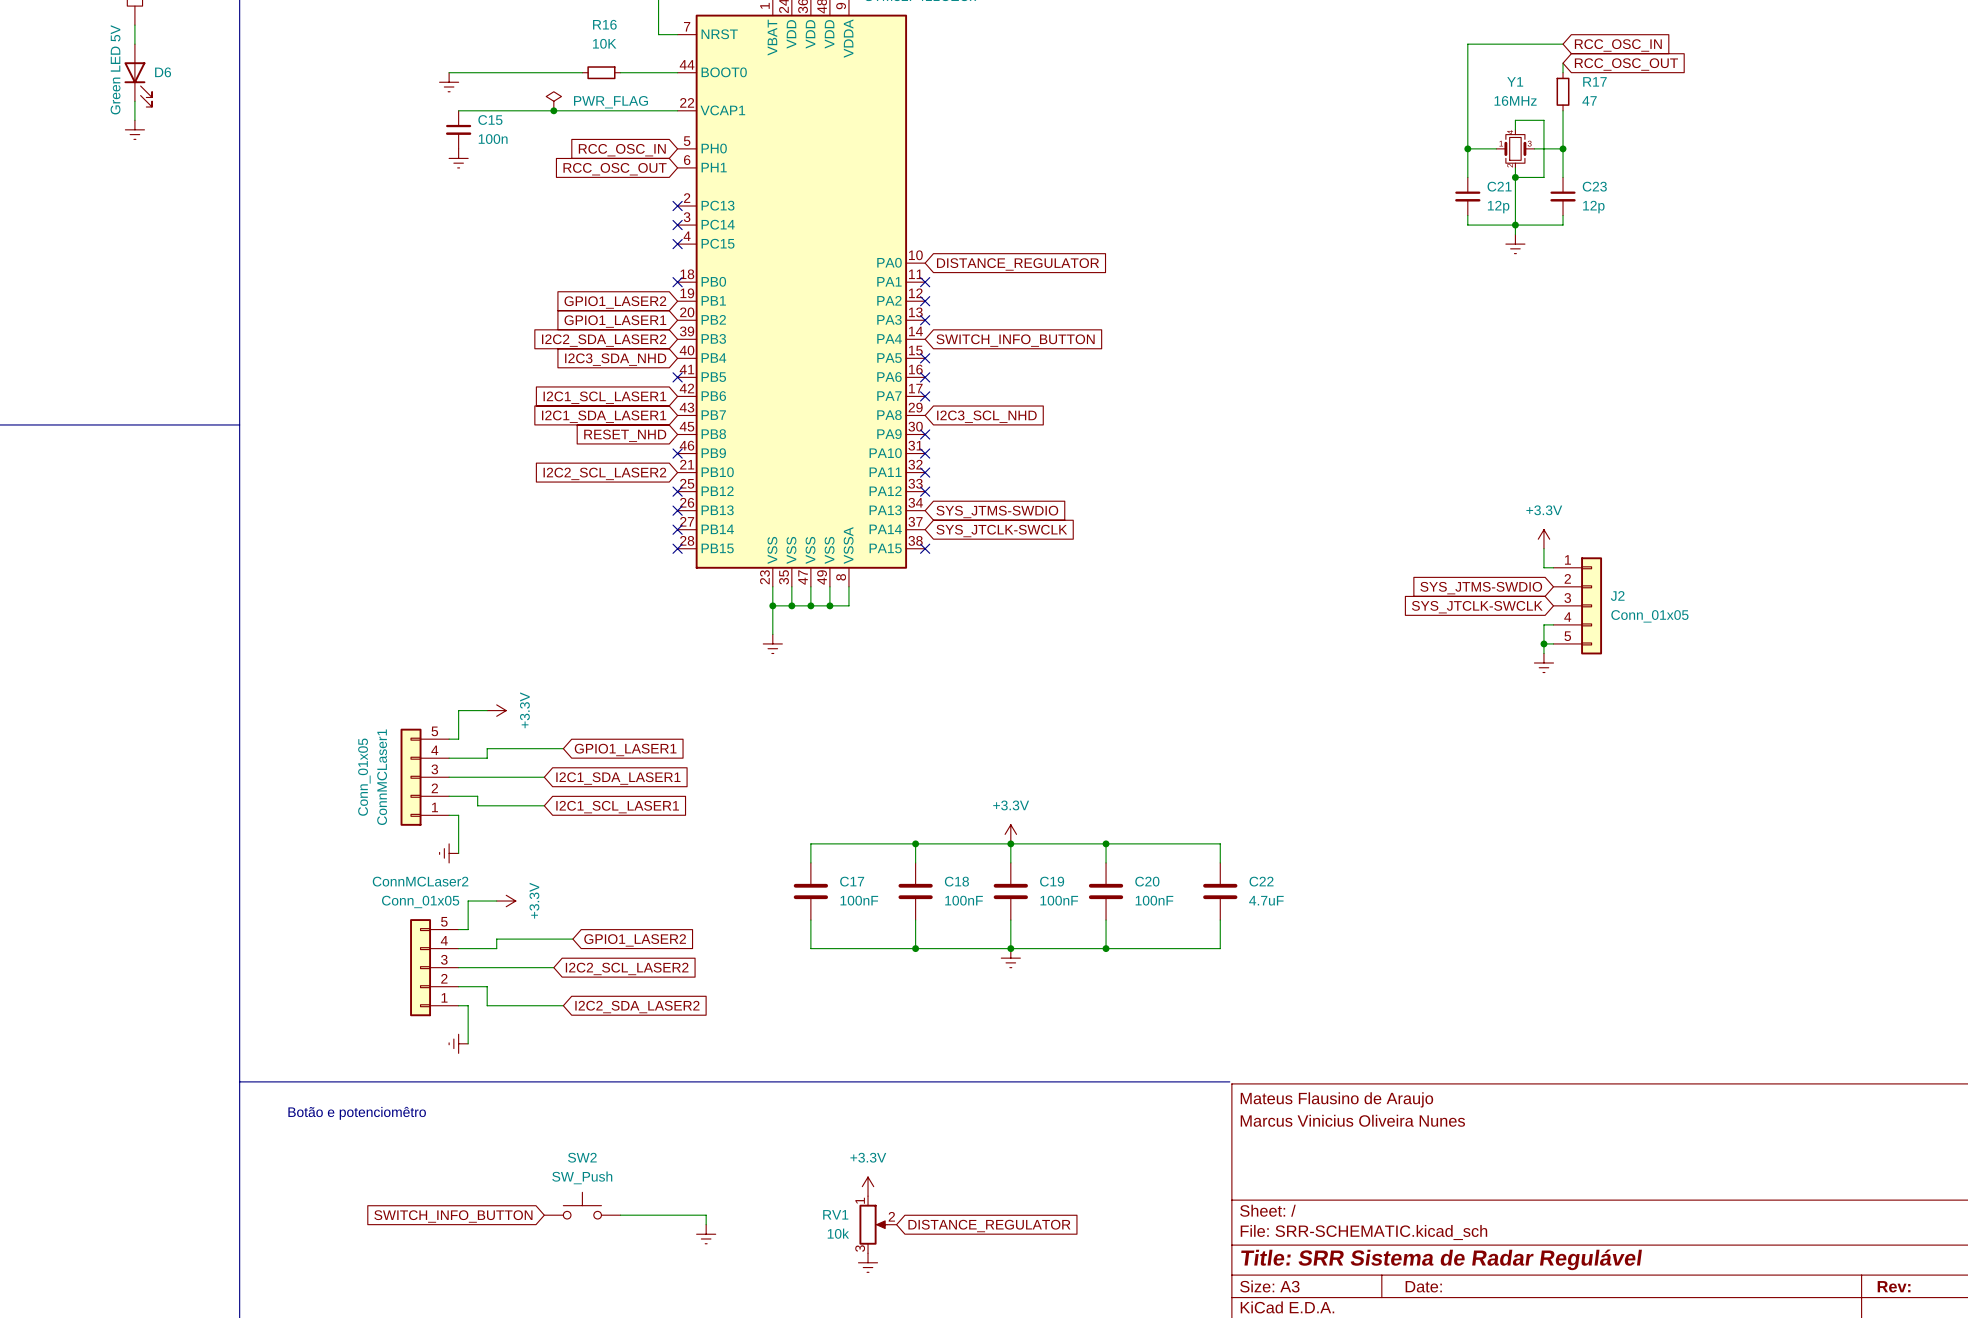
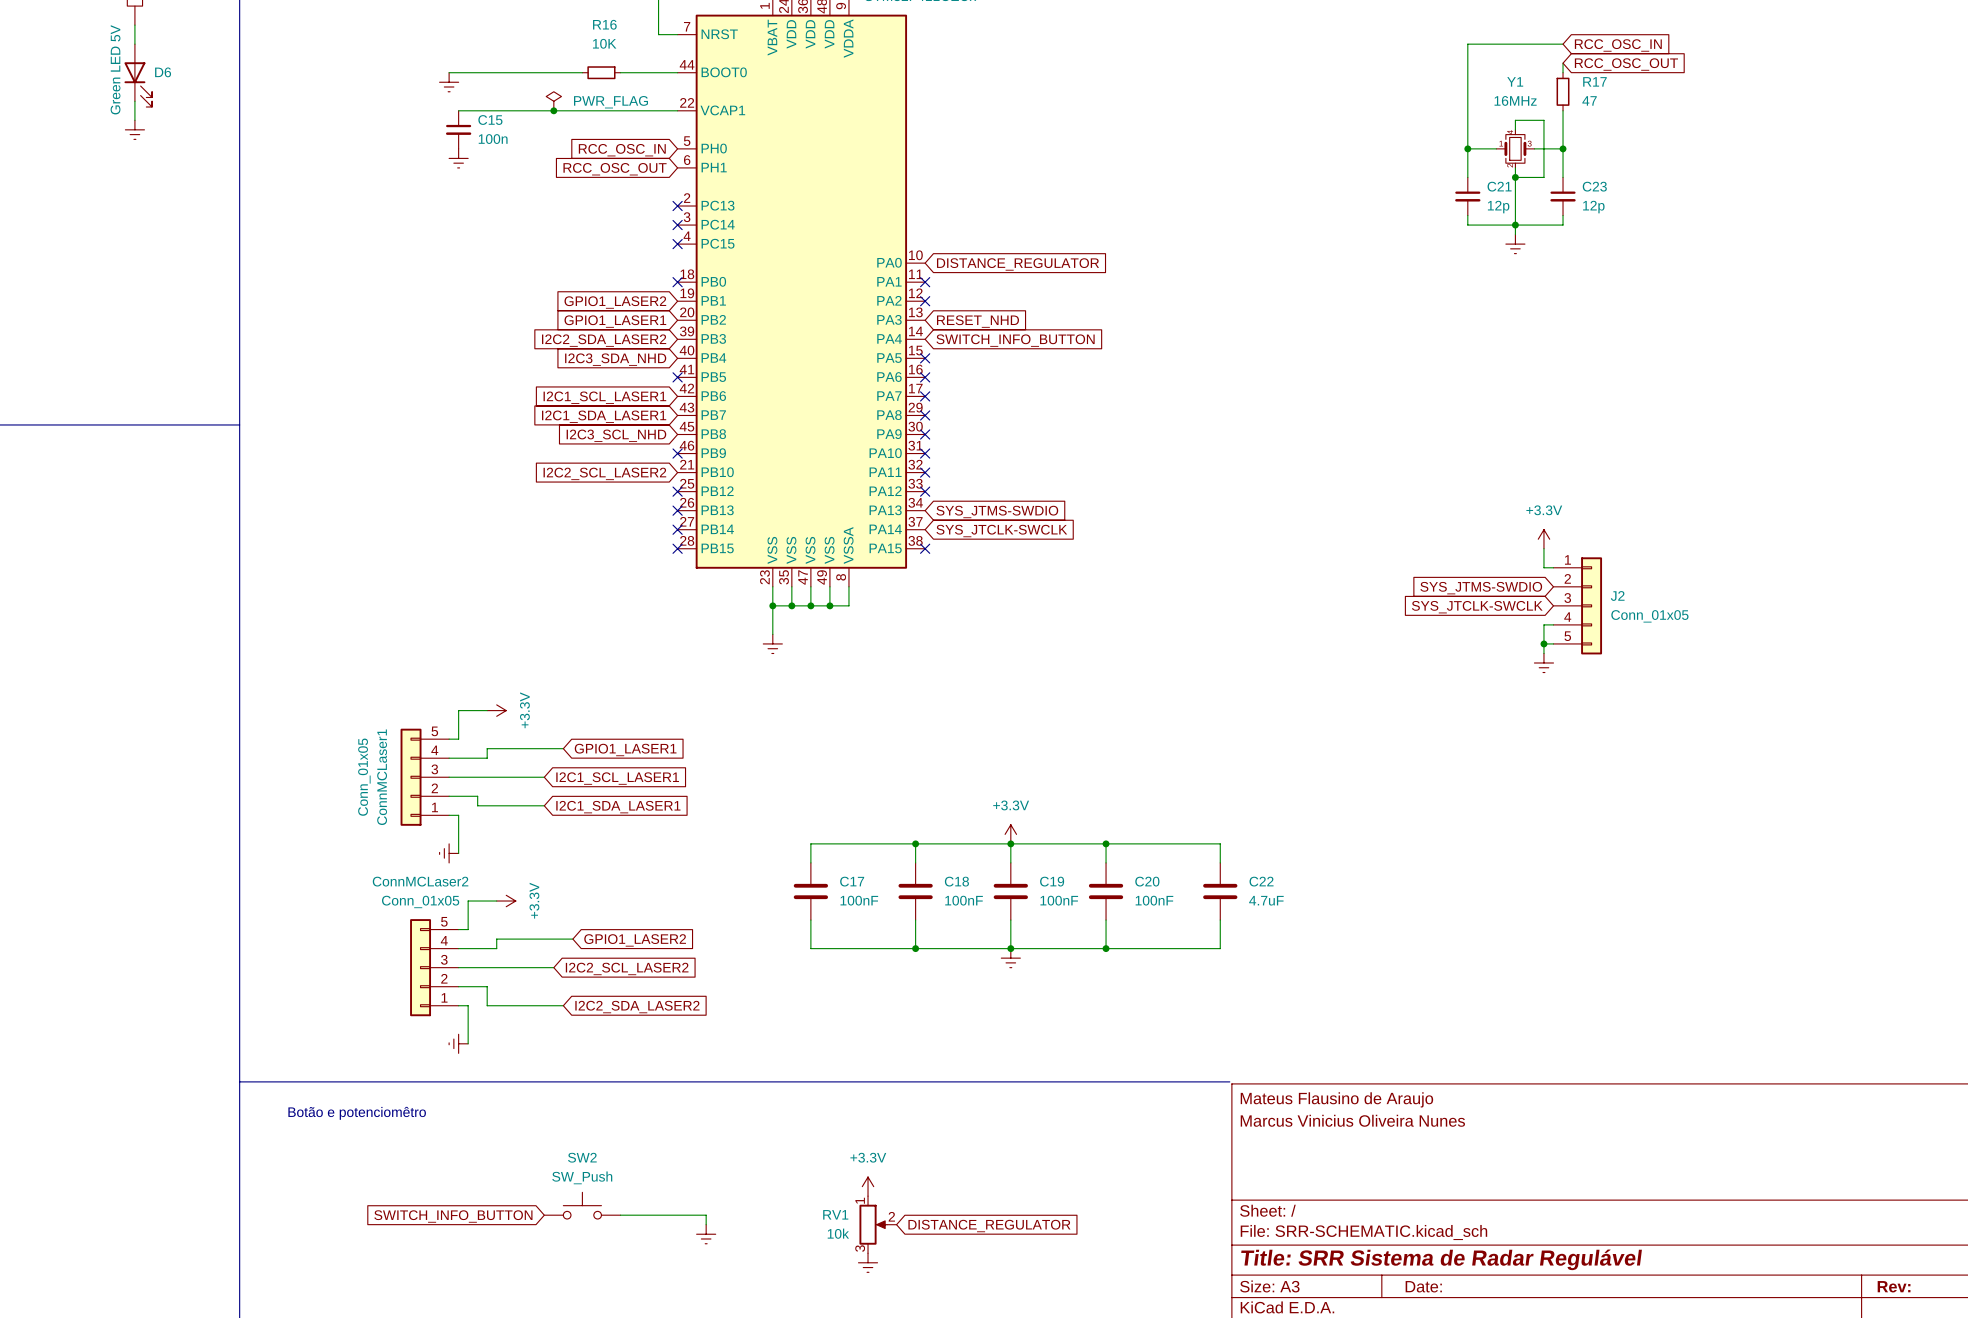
no-connect mark: (925, 320) -> none
global label: none -> RESET_NHD (977, 321)
no-connect mark: none -> (925, 415)
global label: I2C3_SCL_NHD (986, 416) -> none
global label: RESET_NHD (625, 435) -> I2C3_SCL_NHD (616, 435)
global label: I2C1_SDA_LASER1 (618, 778) -> I2C1_SCL_LASER1 (617, 778)
global label: I2C1_SCL_LASER1 (617, 807) -> I2C1_SDA_LASER1 (618, 807)

